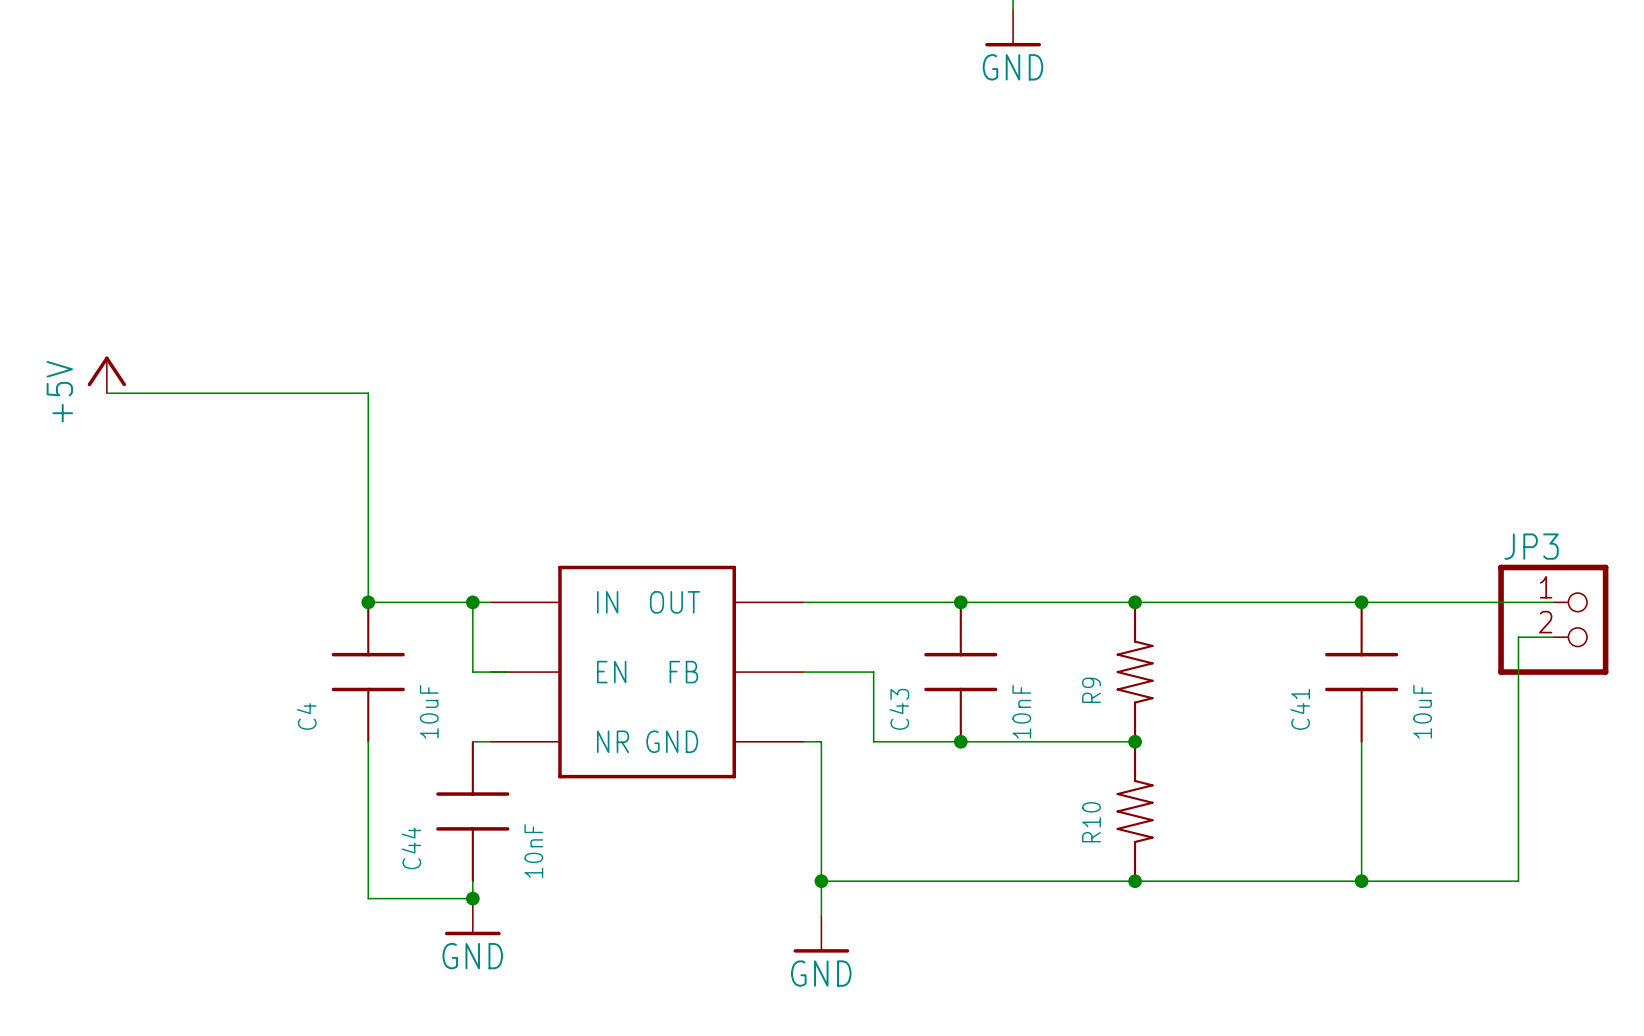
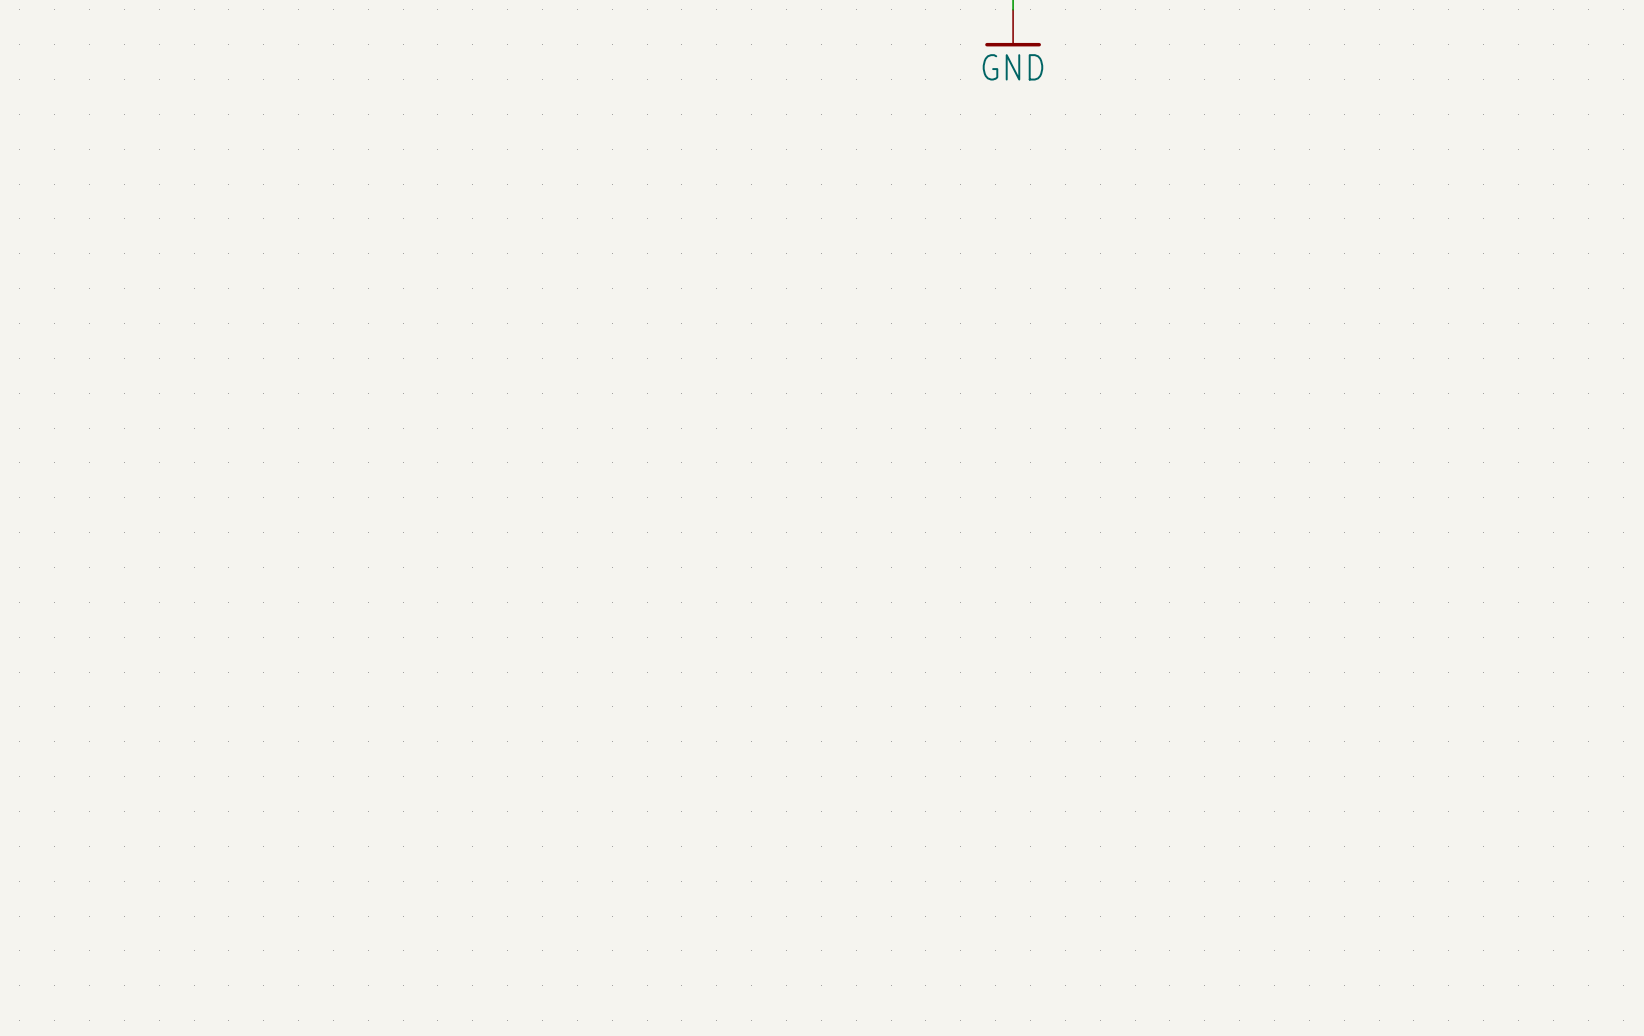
power symbol: +5V (106, 374) -> none
wire: (106, 393) (368, 393) (368, 602) (490, 602) -> none
junction: (368, 602) -> none
wire: (472, 602) (472, 672) (507, 672) -> none
junction: (472, 602) -> none
wire: (803, 602) (1553, 602) -> none
junction: (960, 602) -> none
junction: (1135, 602) -> none
junction: (1361, 602) -> none
JP3: (1553, 619) -> none
wire: (1553, 637) (1518, 637) (1518, 881) (821, 881) -> none
C4: 10uF (368, 672) -> none
part: (647, 672) -> none
wire: (803, 672) (873, 672) (873, 741) (1135, 741) -> none
C43: 10nF (960, 672) -> none
R9: (1135, 672) -> none
C41: 10uF (1361, 672) -> none
wire: (368, 741) (368, 898) (472, 898) (472, 881) -> none
wire: (472, 741) (490, 741) -> none
wire: (803, 741) (821, 741) (821, 916) -> none
junction: (960, 741) -> none
junction: (1135, 741) -> none
wire: (1361, 741) (1361, 881) -> none
C44: 10nF (472, 811) -> none
R10: (1135, 811) -> none
junction: (821, 881) -> none
junction: (1135, 881) -> none
junction: (1361, 881) -> none
junction: (472, 898) -> none
power symbol: GND (472, 916) -> none
power symbol: GND (821, 934) -> none

